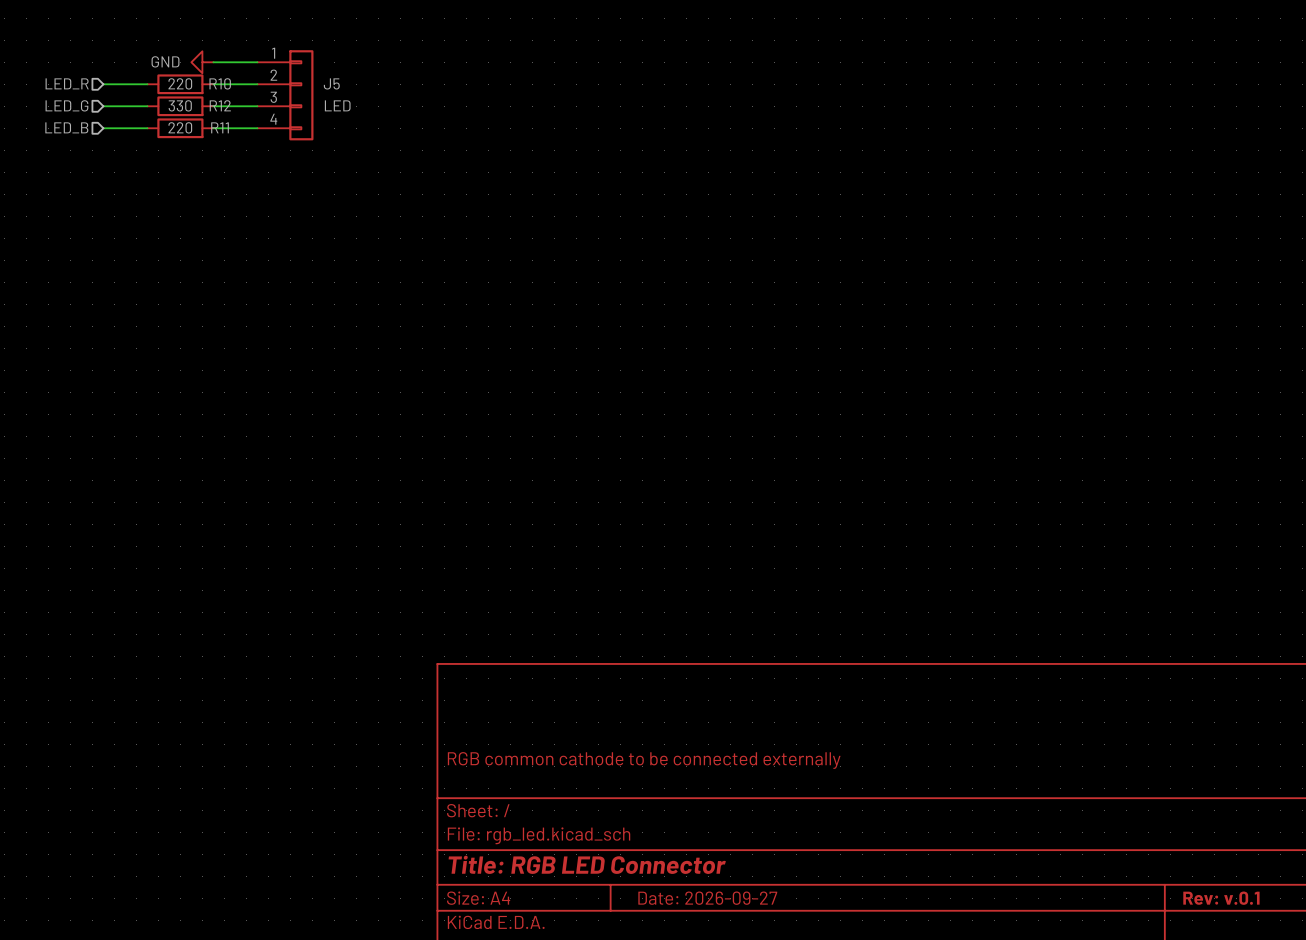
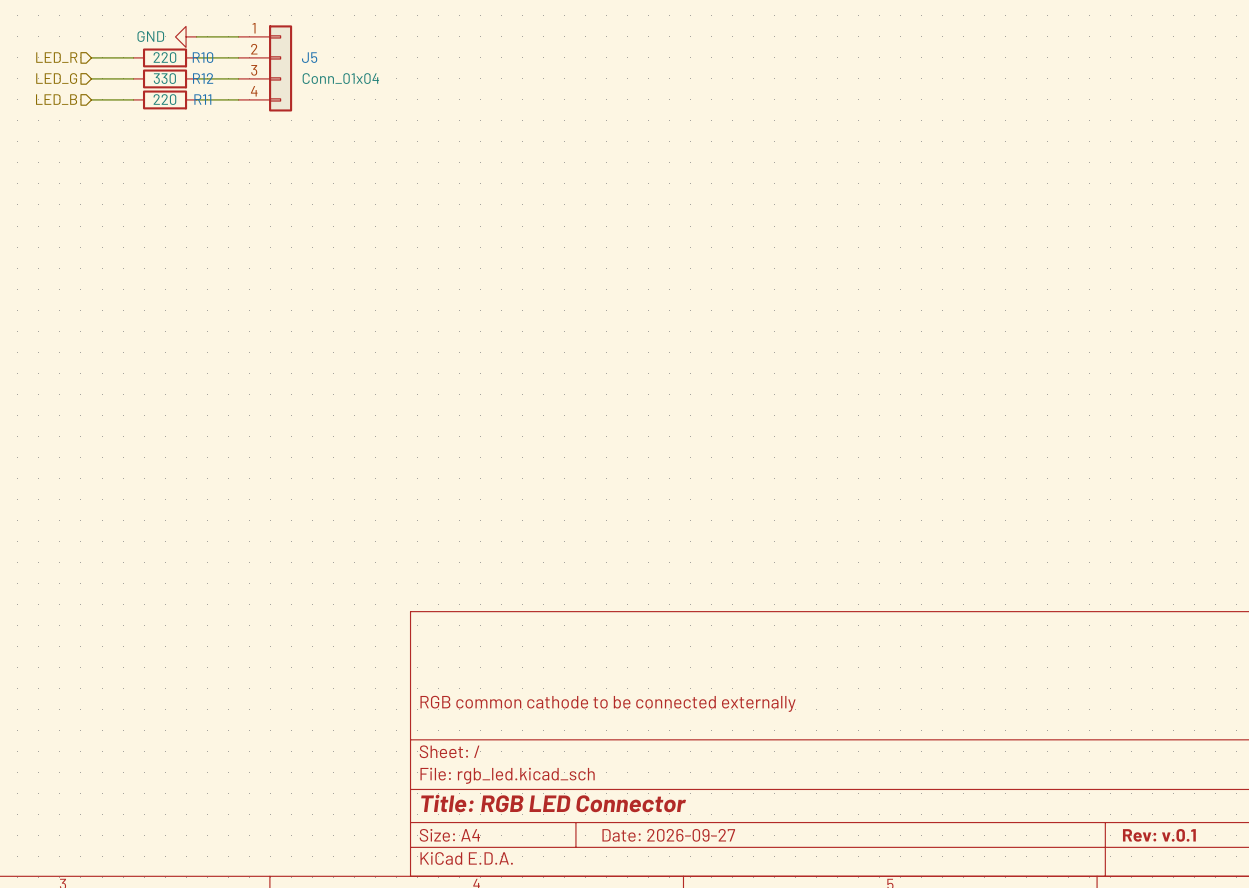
J5 value: LED (337, 105) -> Conn_01x04 (340, 78)

